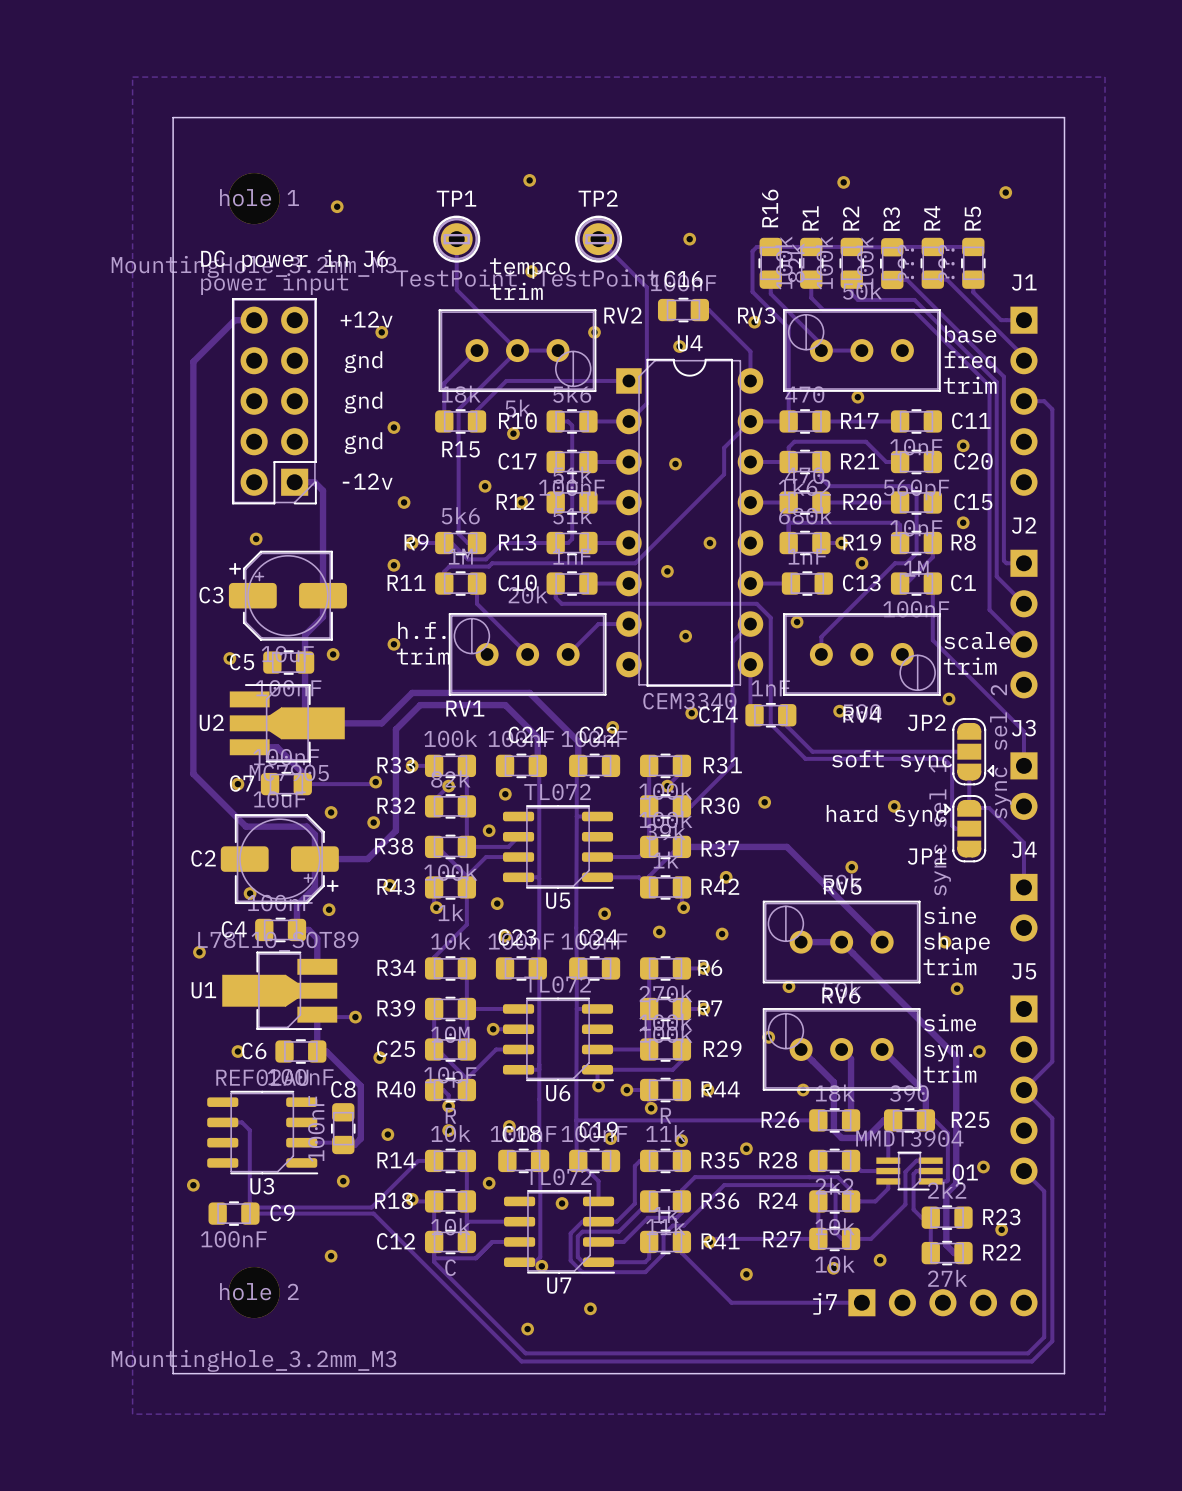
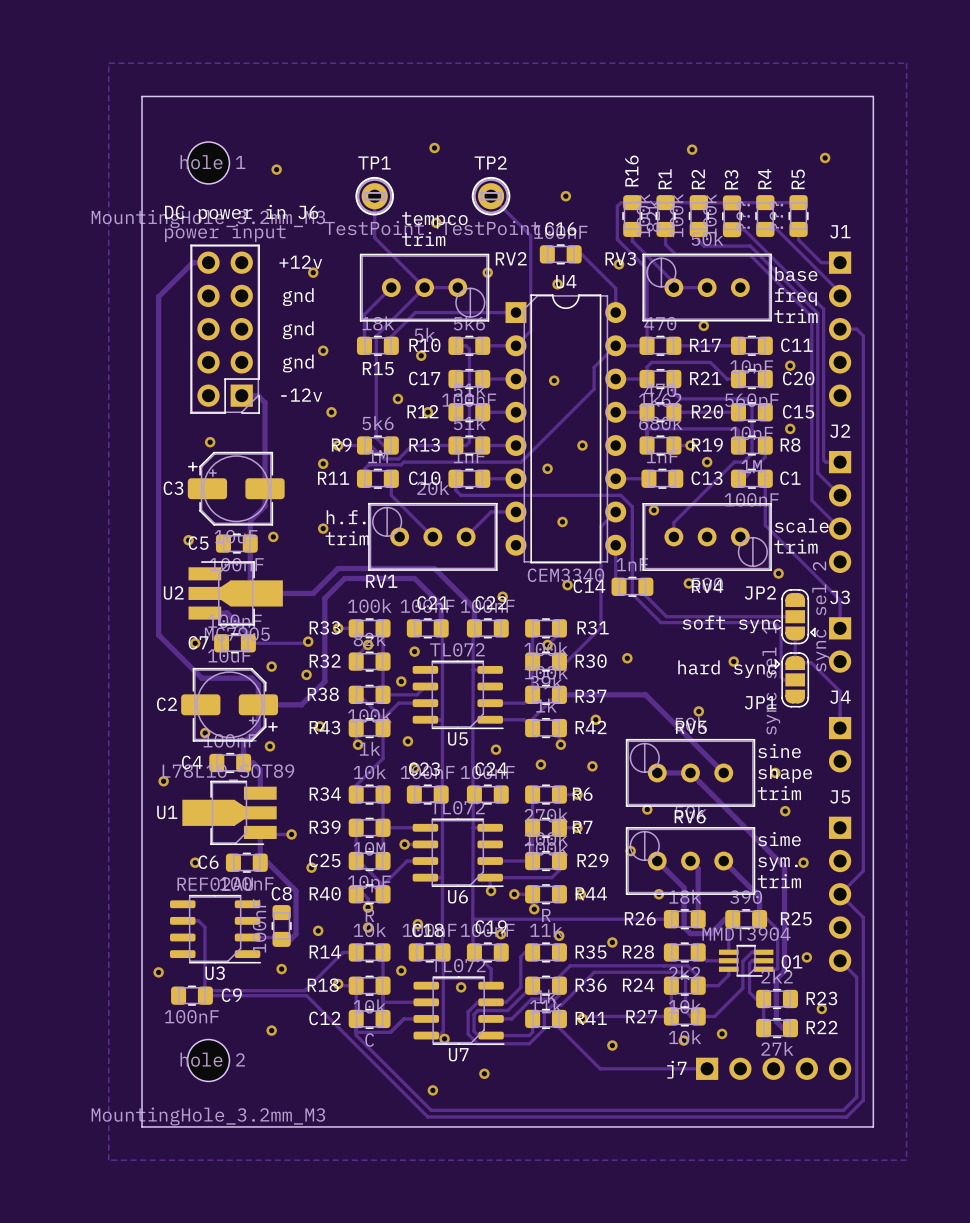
hole 1 footprint: [228, 173, 280, 225] -> [187, 142, 230, 184]
hole 2 footprint: [228, 1267, 280, 1319] -> [187, 1039, 230, 1082]

